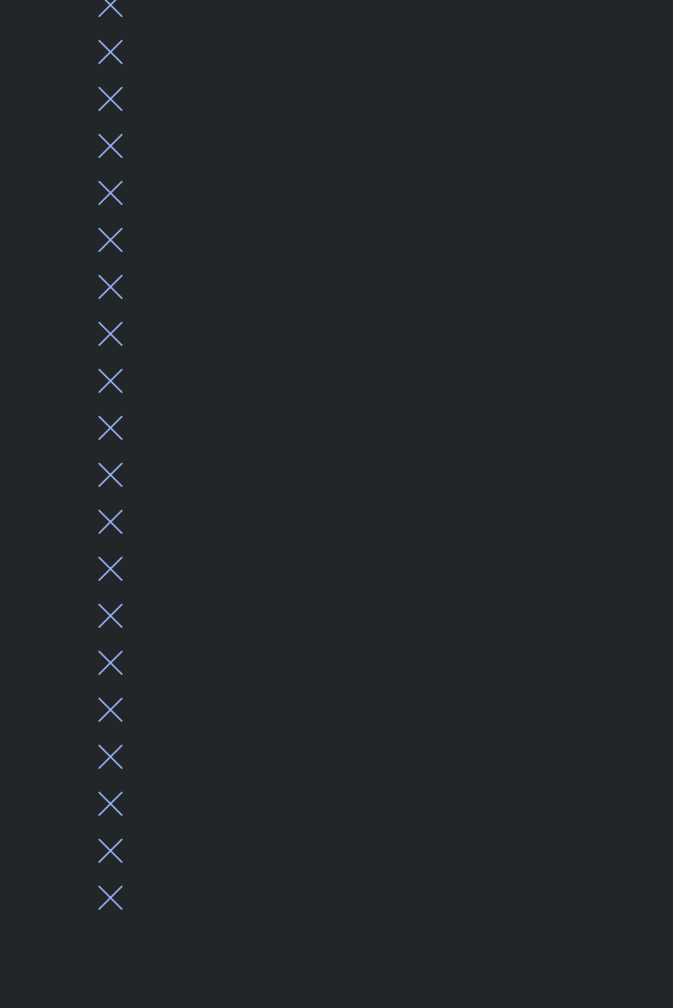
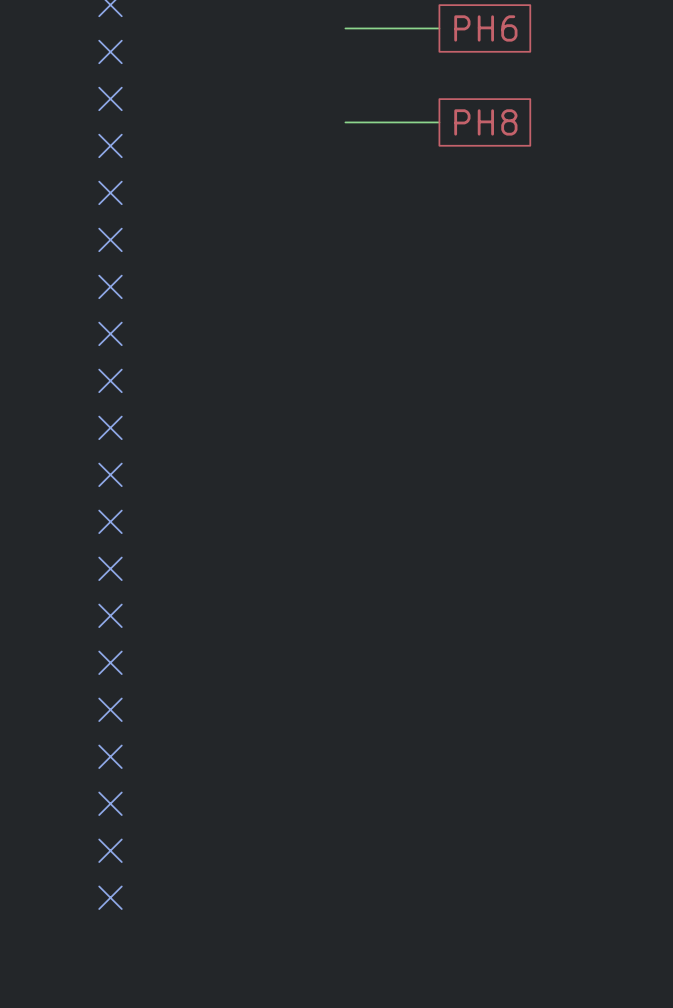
wire: none -> (345, 28) (439, 28)
global label: none -> PH6 (485, 28)
wire: none -> (345, 122) (439, 122)
global label: none -> PH8 (485, 122)

